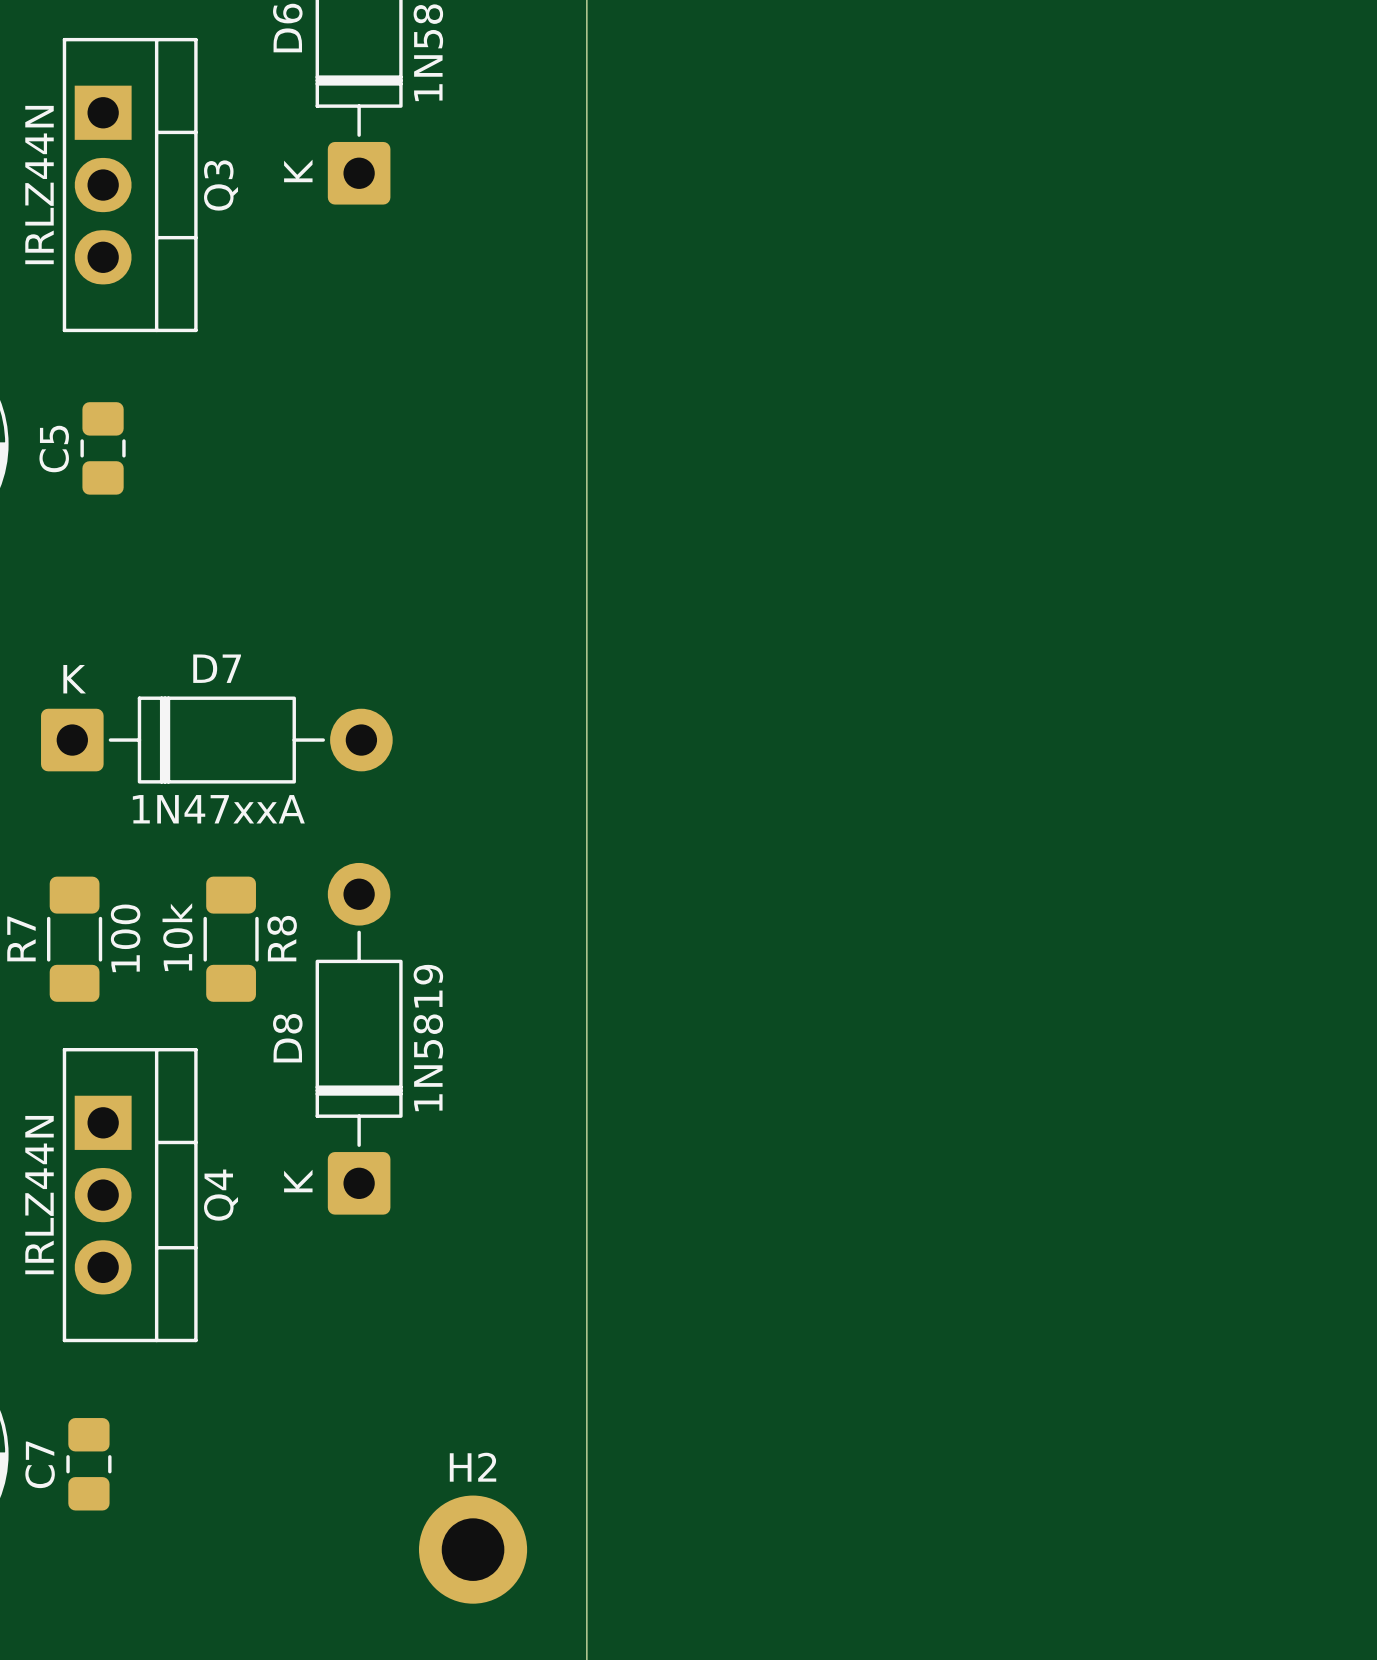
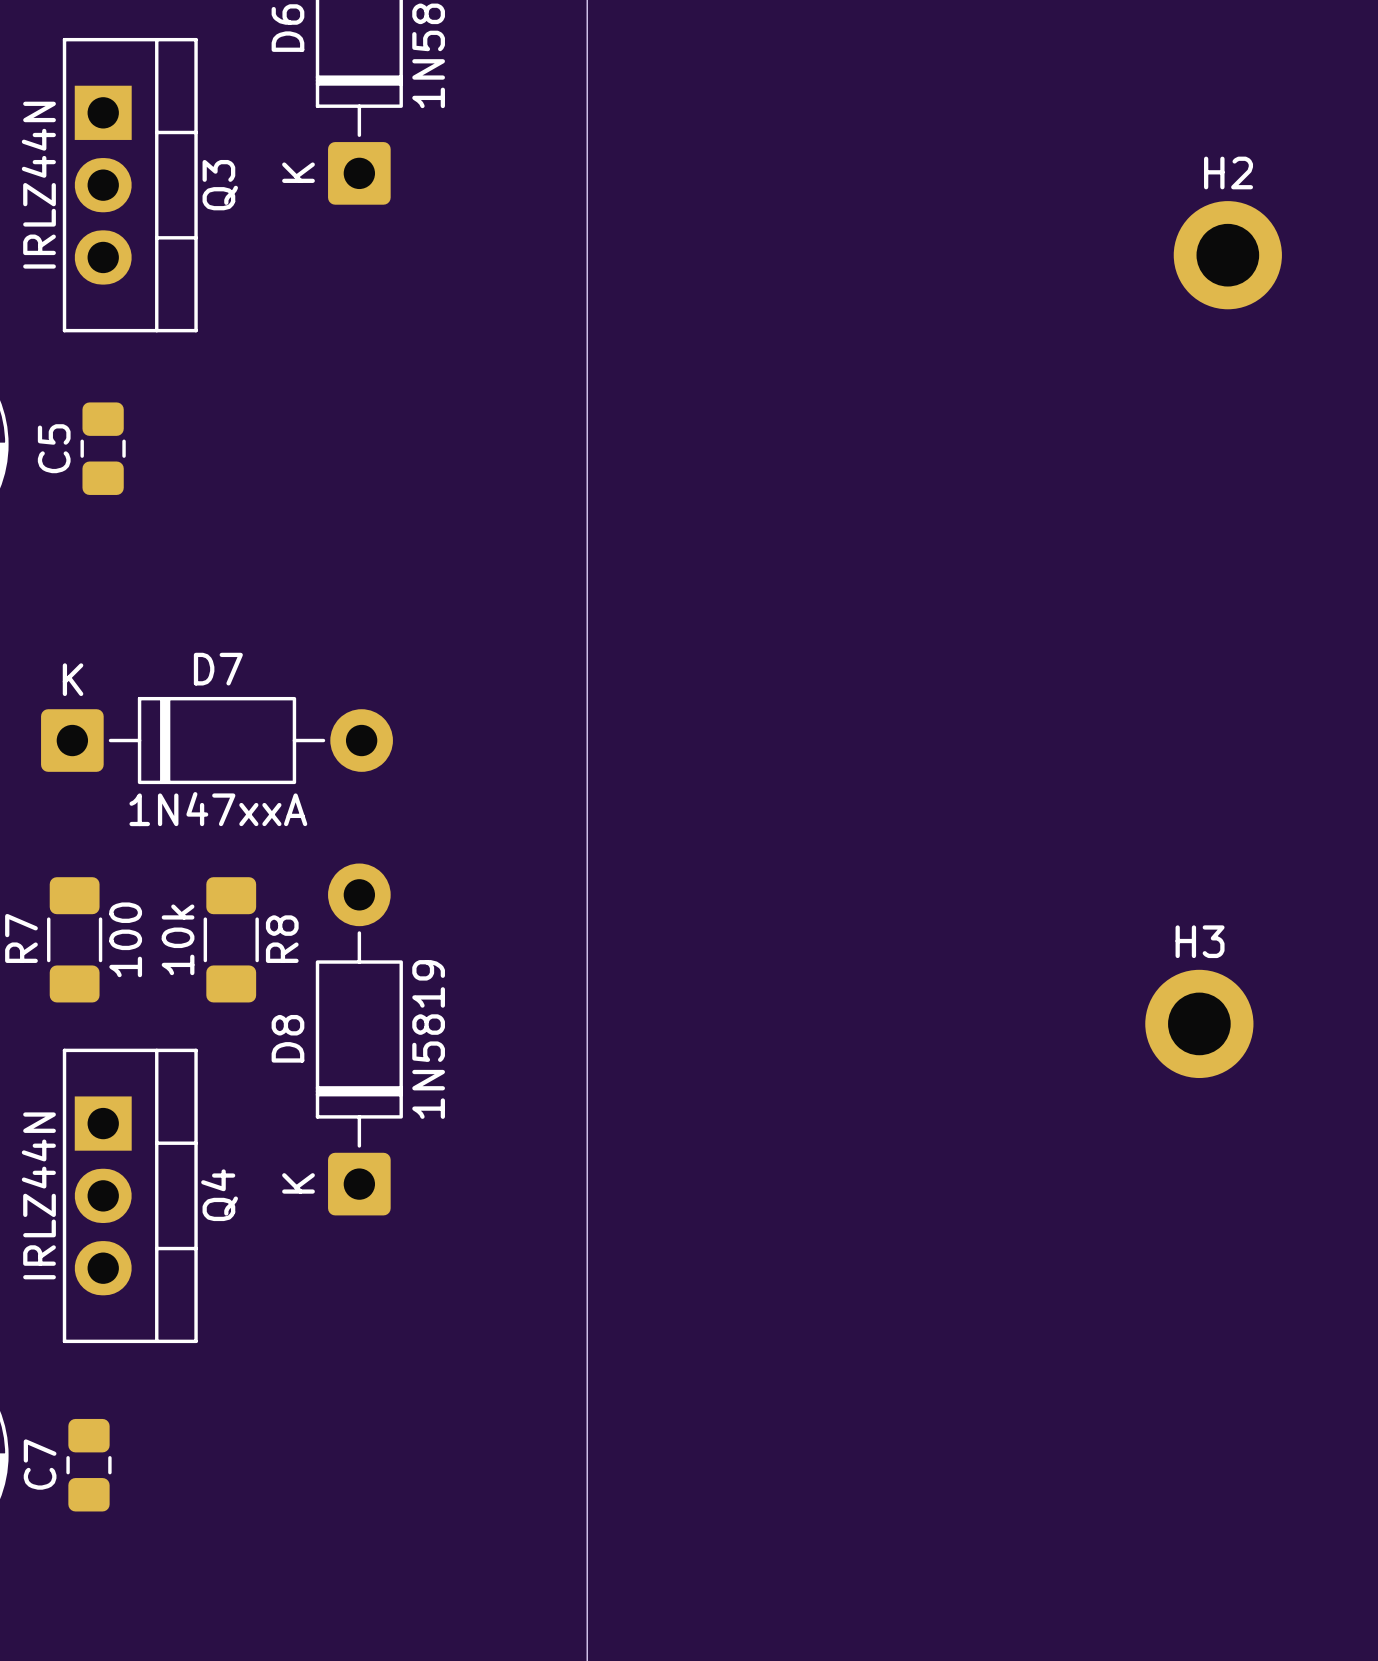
H3: none -> (1199, 1023)
H2 position: (473, 1549) -> (1227, 255)

